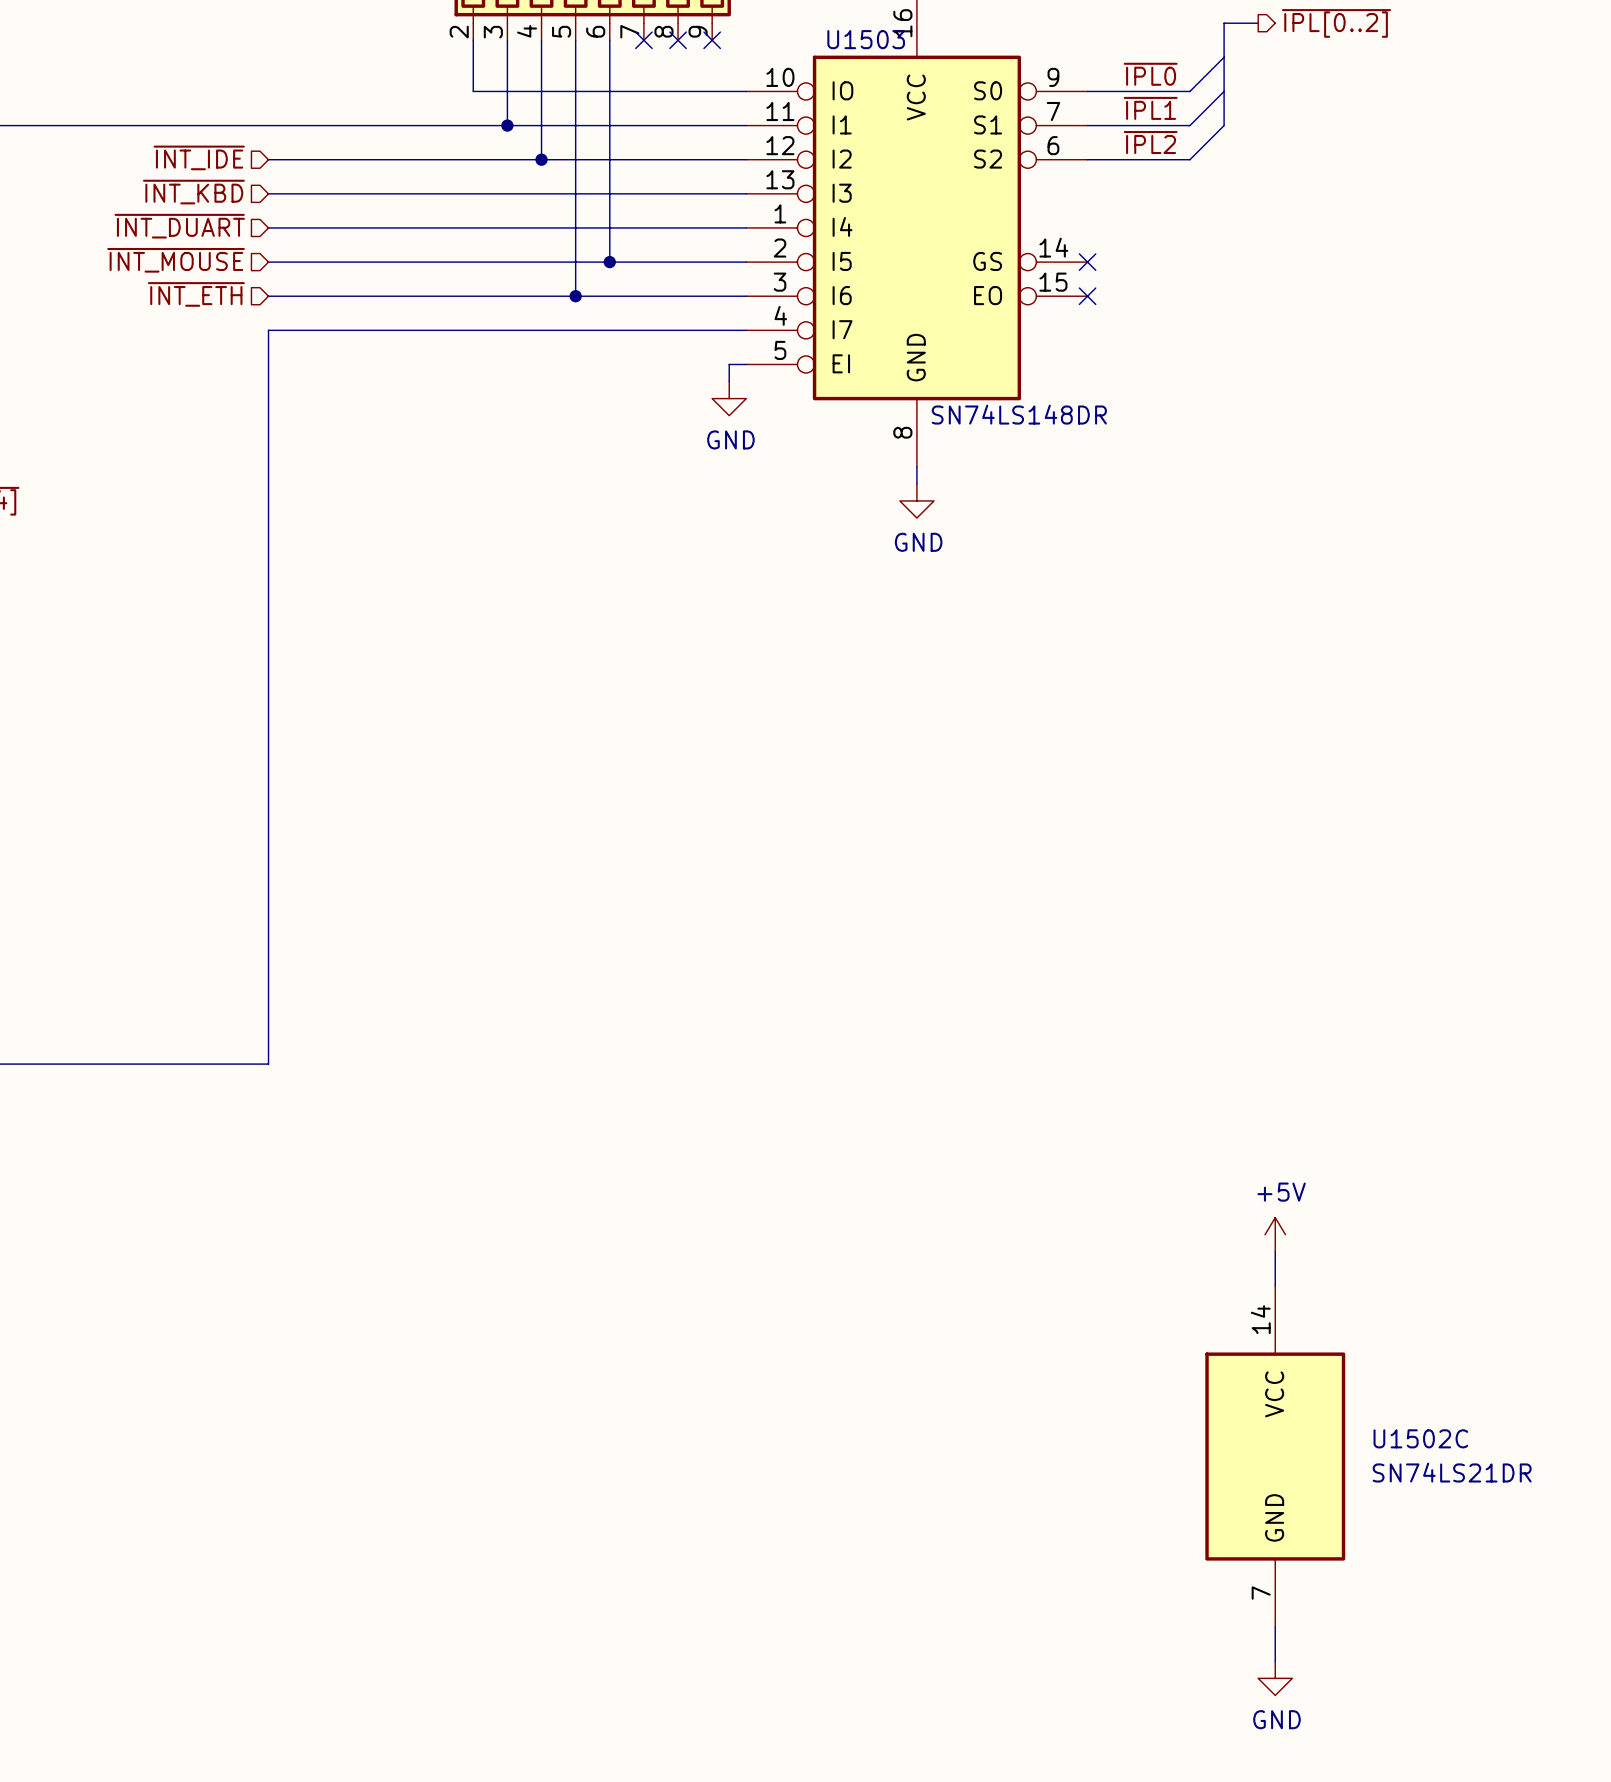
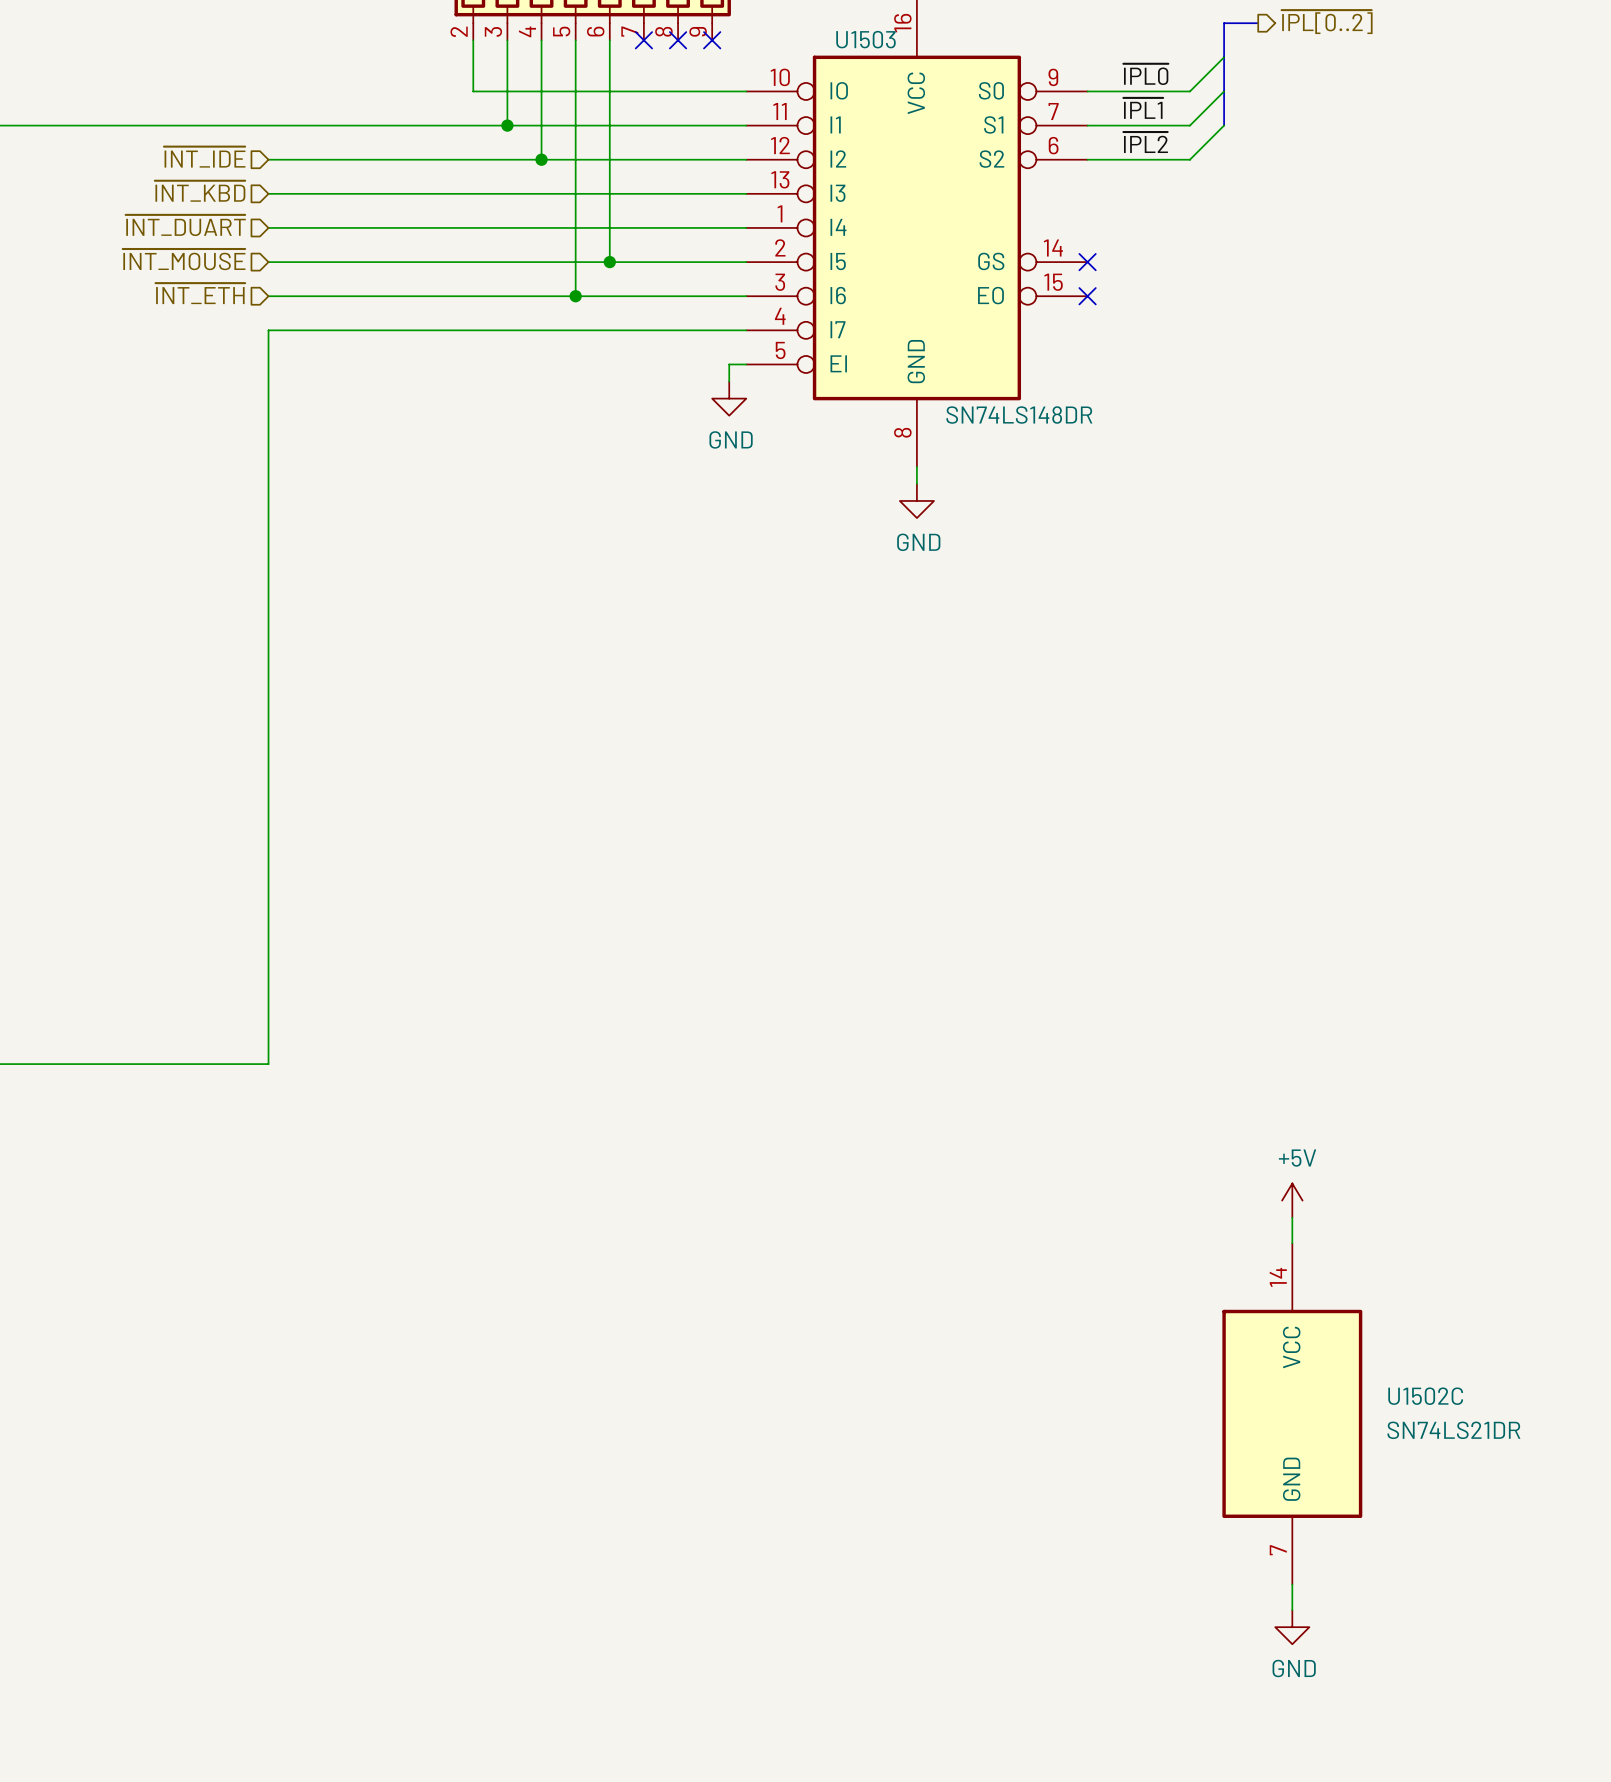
wire: none -> (1292, 1217) (1292, 1243)
power symbol position: +5V (1275, 1234) -> +5V (1292, 1200)
wire: (1275, 1251) (1275, 1285) -> none
U1502C position: (1275, 1456) -> (1292, 1413)
wire: none -> (1292, 1584) (1292, 1610)
wire: (1275, 1627) (1275, 1661) -> none
power symbol position: GND (1275, 1678) -> GND (1292, 1627)

